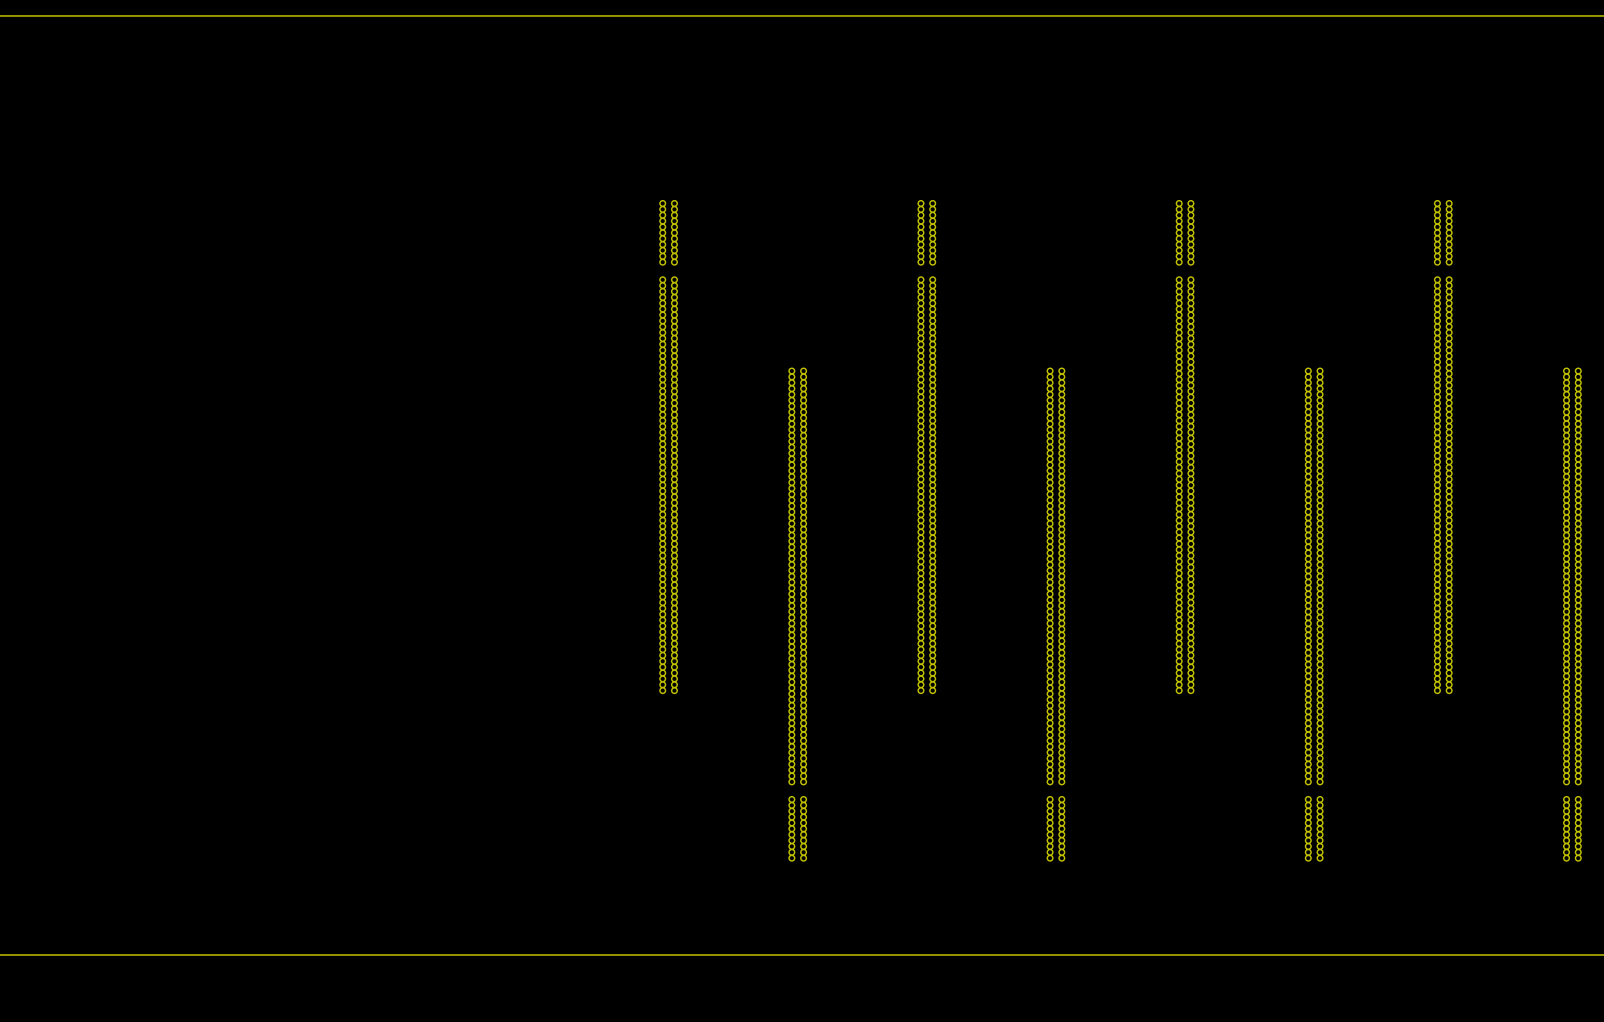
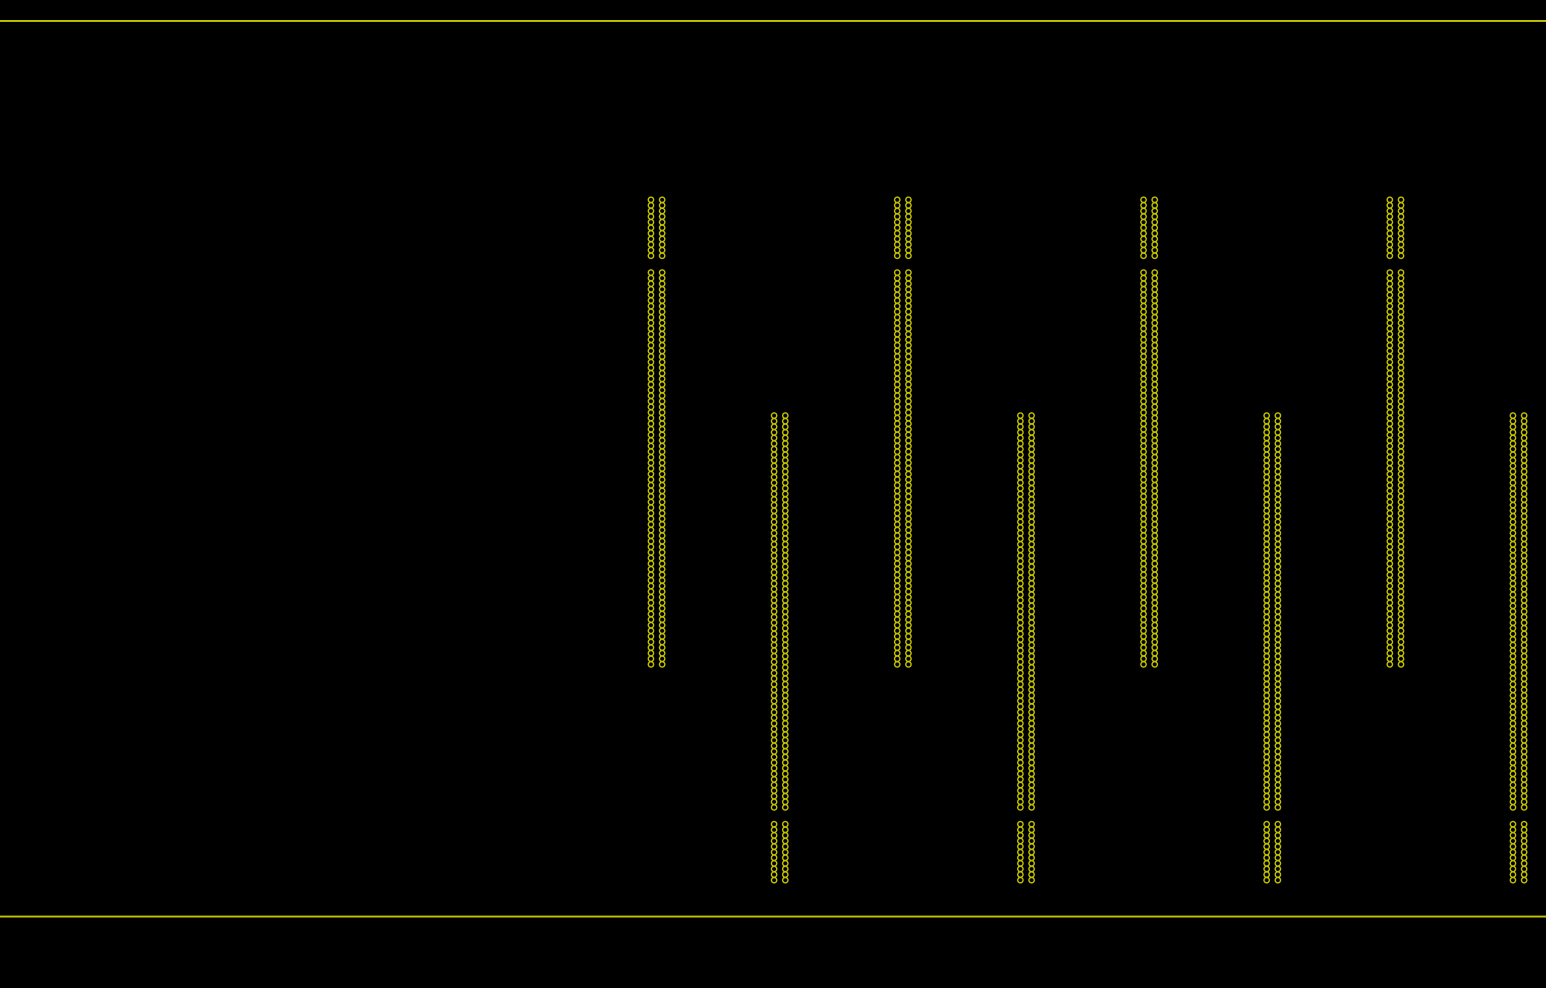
part position: (797, 614) -> (779, 647)
part position: (1055, 614) -> (1025, 647)
part position: (1314, 614) -> (1272, 647)
part position: (1572, 614) -> (1518, 647)

